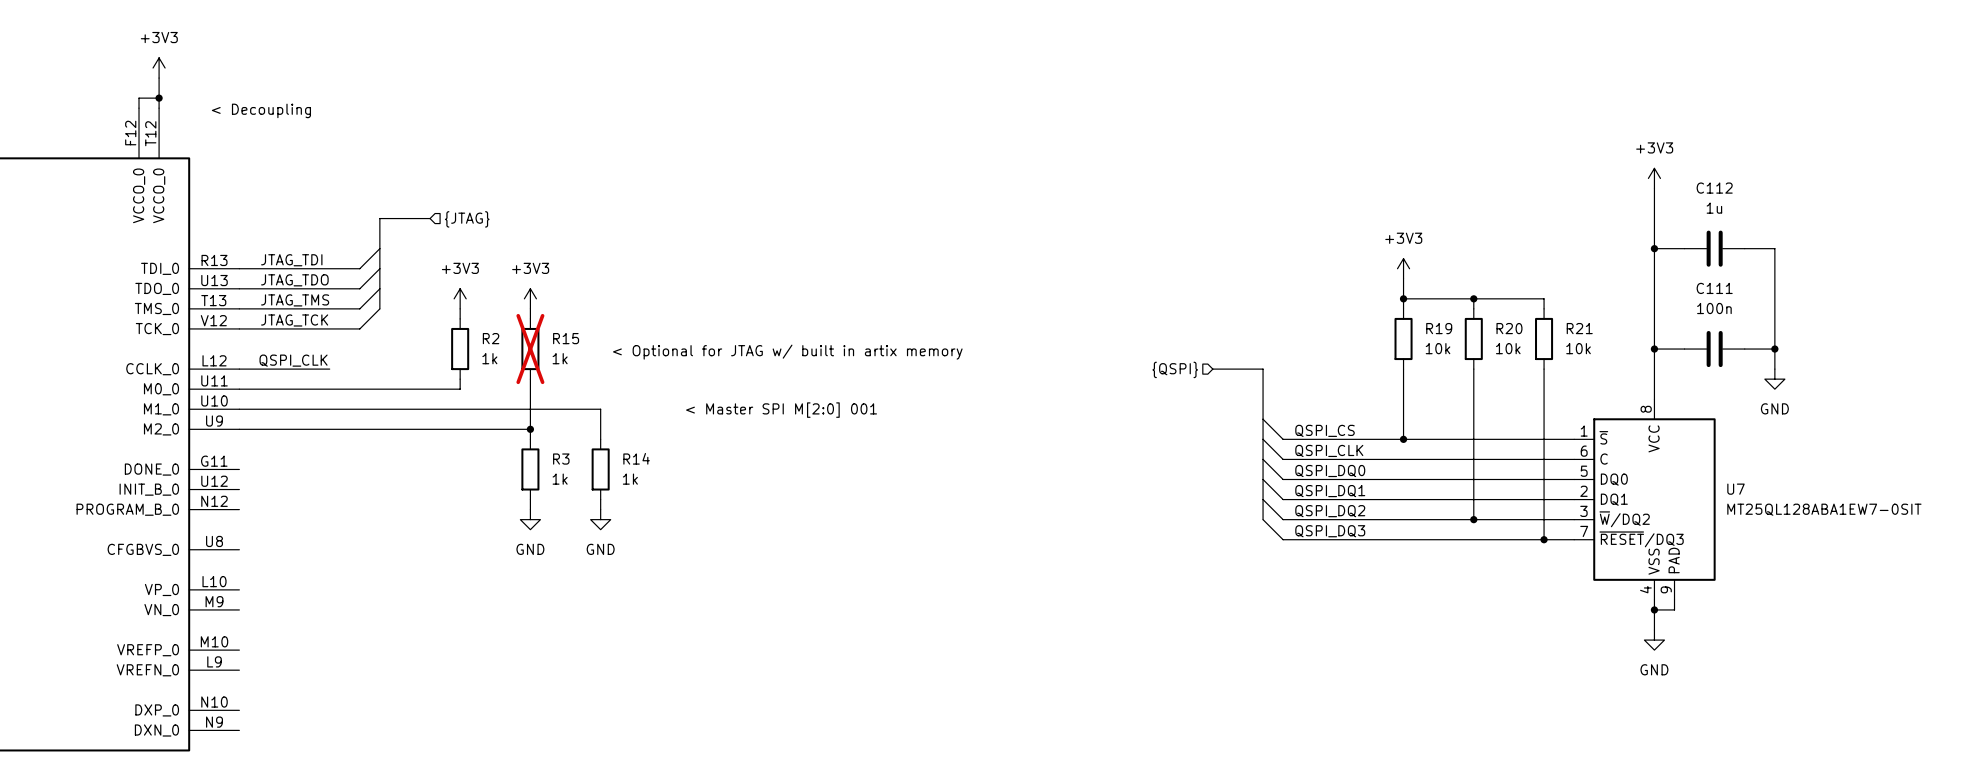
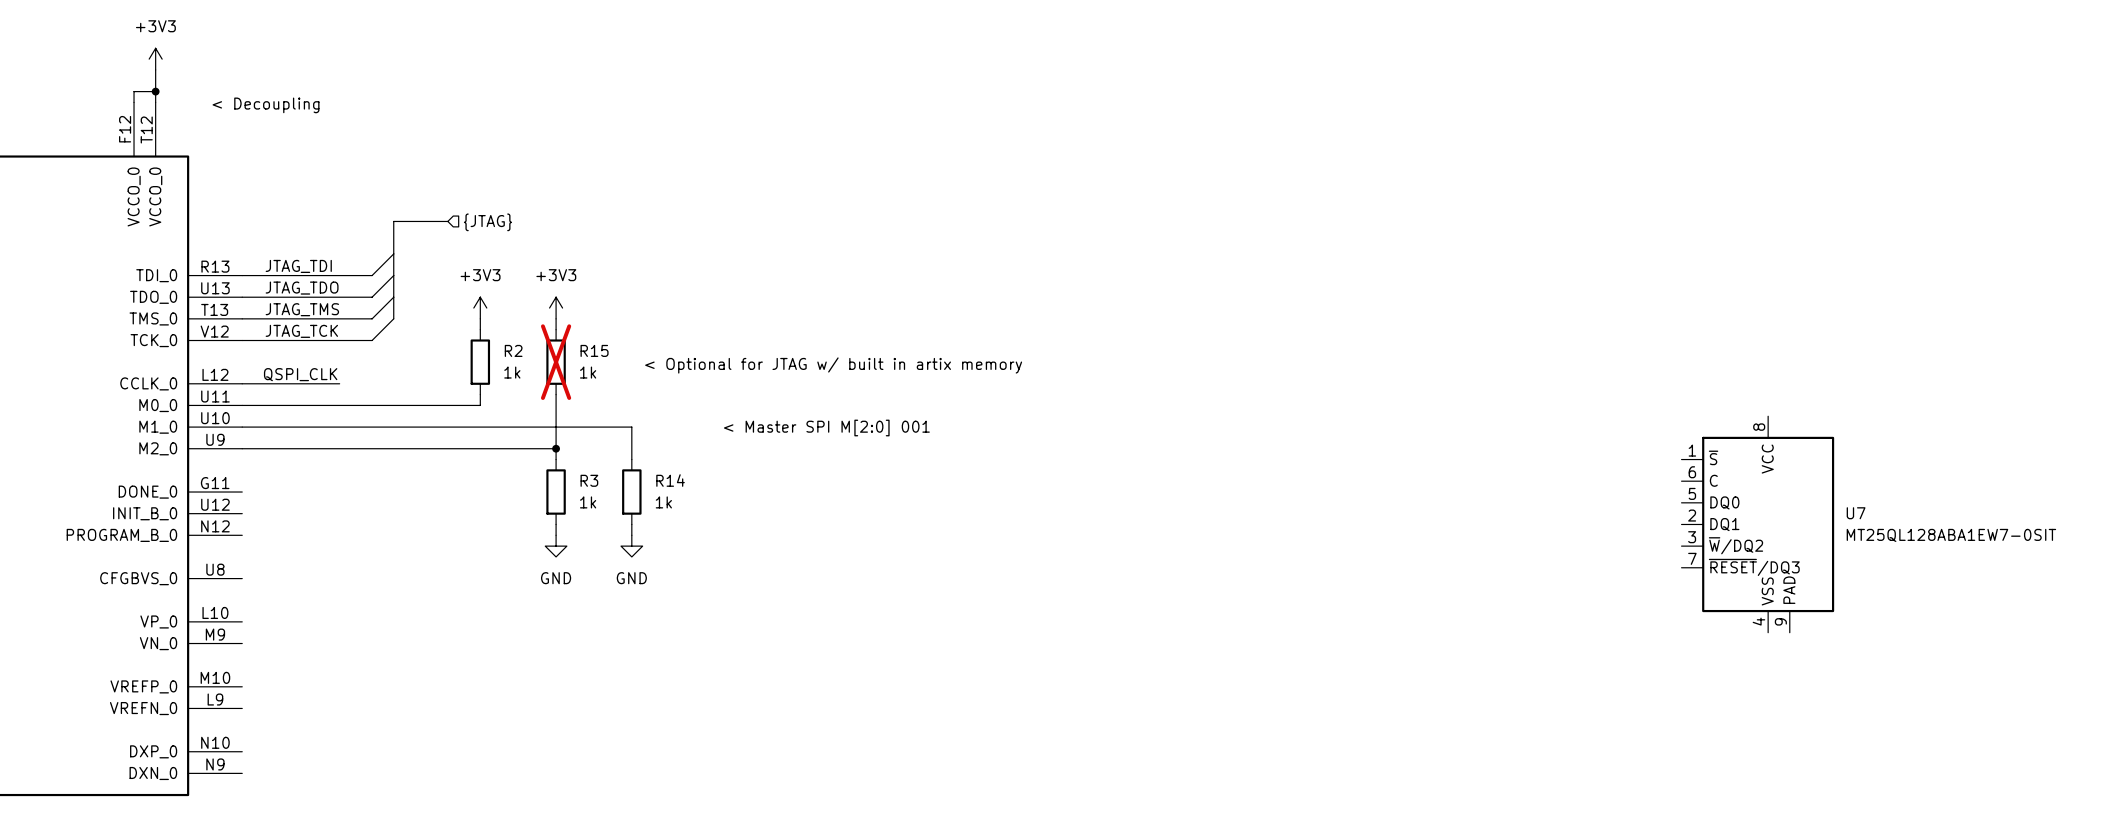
power symbol: +3V3 (1654, 178) -> none
wire: (1654, 188) (1654, 399) -> none
wire: (1654, 248) (1684, 248) -> none
junction: (1654, 248) -> none
C112: 1u (1714, 248) -> none
wire: (1744, 248) (1774, 248) (1774, 369) -> none
power symbol: +3V3 (1403, 268) -> none
wire: (1403, 278) (1403, 308) -> none
wire: (1403, 298) (1544, 298) (1544, 308) -> none
junction: (1403, 298) -> none
wire: (1473, 298) (1473, 308) -> none
junction: (1473, 298) -> none
R19: 10k (1403, 338) -> none
R20: 10k (1473, 338) -> none
R21: 10k (1544, 338) -> none
wire: (1654, 349) (1684, 349) -> none
junction: (1654, 349) -> none
C111: 100n (1714, 349) -> none
wire: (1744, 349) (1774, 349) -> none
junction: (1774, 349) -> none
hierarchical label: {QSPI} (1175, 369) -> none
bus: (1212, 369) (1263, 369) (1263, 519) -> none
wire: (1403, 369) (1403, 439) -> none
wire: (1473, 369) (1473, 519) -> none
wire: (1544, 369) (1544, 539) -> none
power symbol: GND (1774, 379) -> none
wire: (1263, 419) (1283, 439) (1574, 439) -> none
label: QSPI_CS (1325, 430) -> none
wire: (1263, 439) (1283, 459) (1574, 459) -> none
junction: (1403, 439) -> none
label: QSPI_CLK (1329, 450) -> none
wire: (1263, 459) (1283, 479) (1574, 479) -> none
label: QSPI_DQ0 (1330, 471) -> none
wire: (1263, 479) (1283, 499) (1574, 499) -> none
label: QSPI_DQ1 (1330, 491) -> none
wire: (1263, 499) (1283, 519) (1574, 519) -> none
label: QSPI_DQ2 (1330, 511) -> none
wire: (1263, 519) (1283, 539) (1574, 539) -> none
junction: (1473, 519) -> none
label: QSPI_DQ3 (1330, 531) -> none
junction: (1544, 539) -> none
wire: (1654, 599) (1654, 630) -> none
wire: (1674, 599) (1674, 609) (1654, 609) -> none
junction: (1654, 609) -> none
power symbol: GND (1654, 640) -> none

